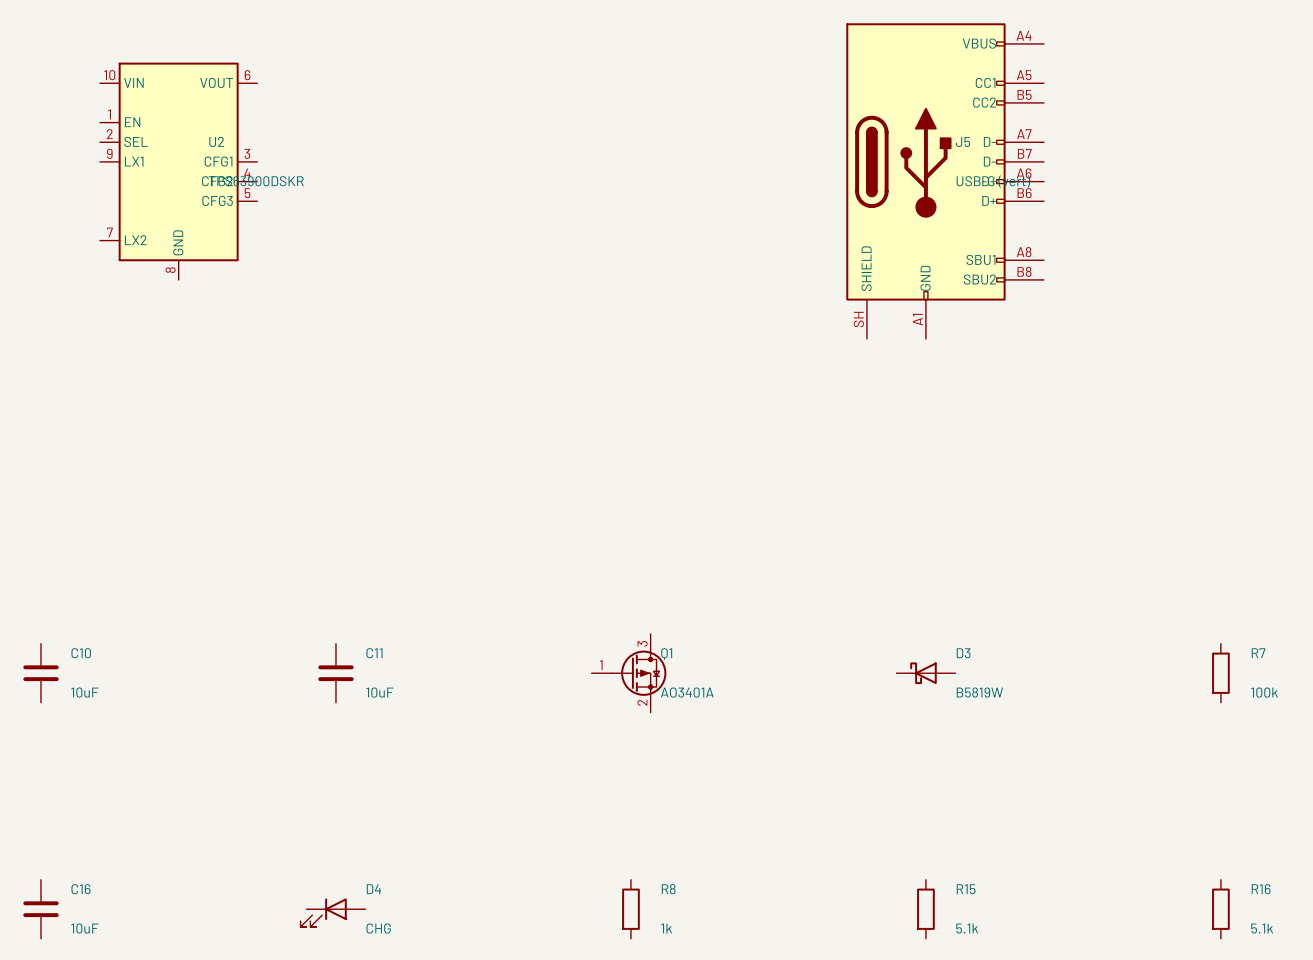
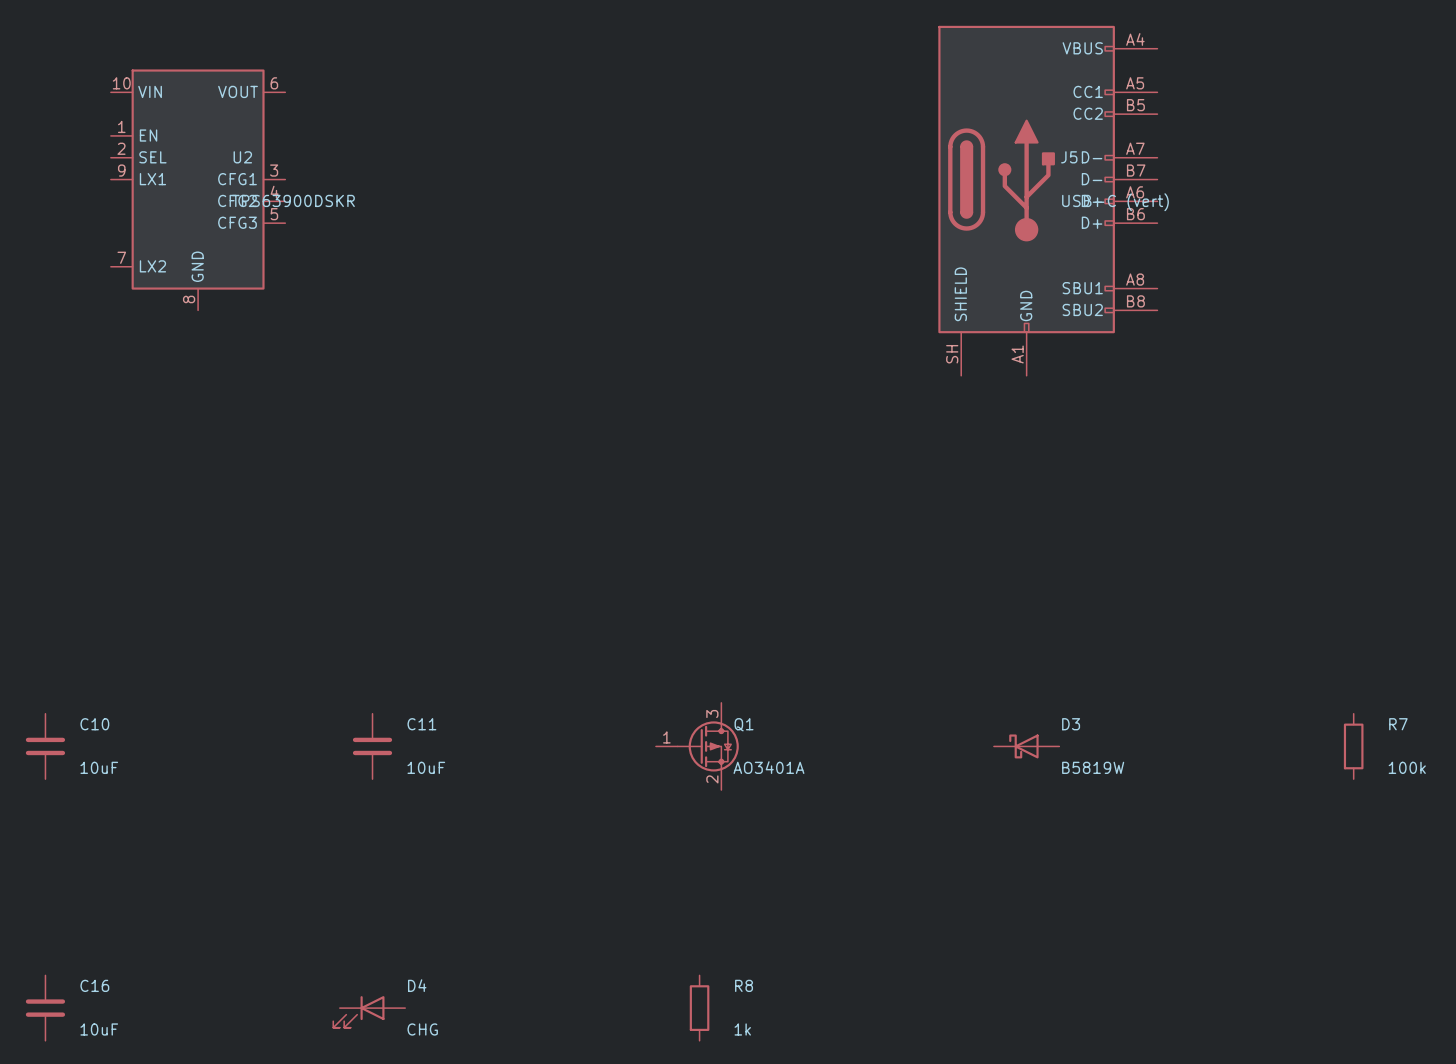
R15: 5.1k (925, 909) -> none
R16: 5.1k (1220, 909) -> none

